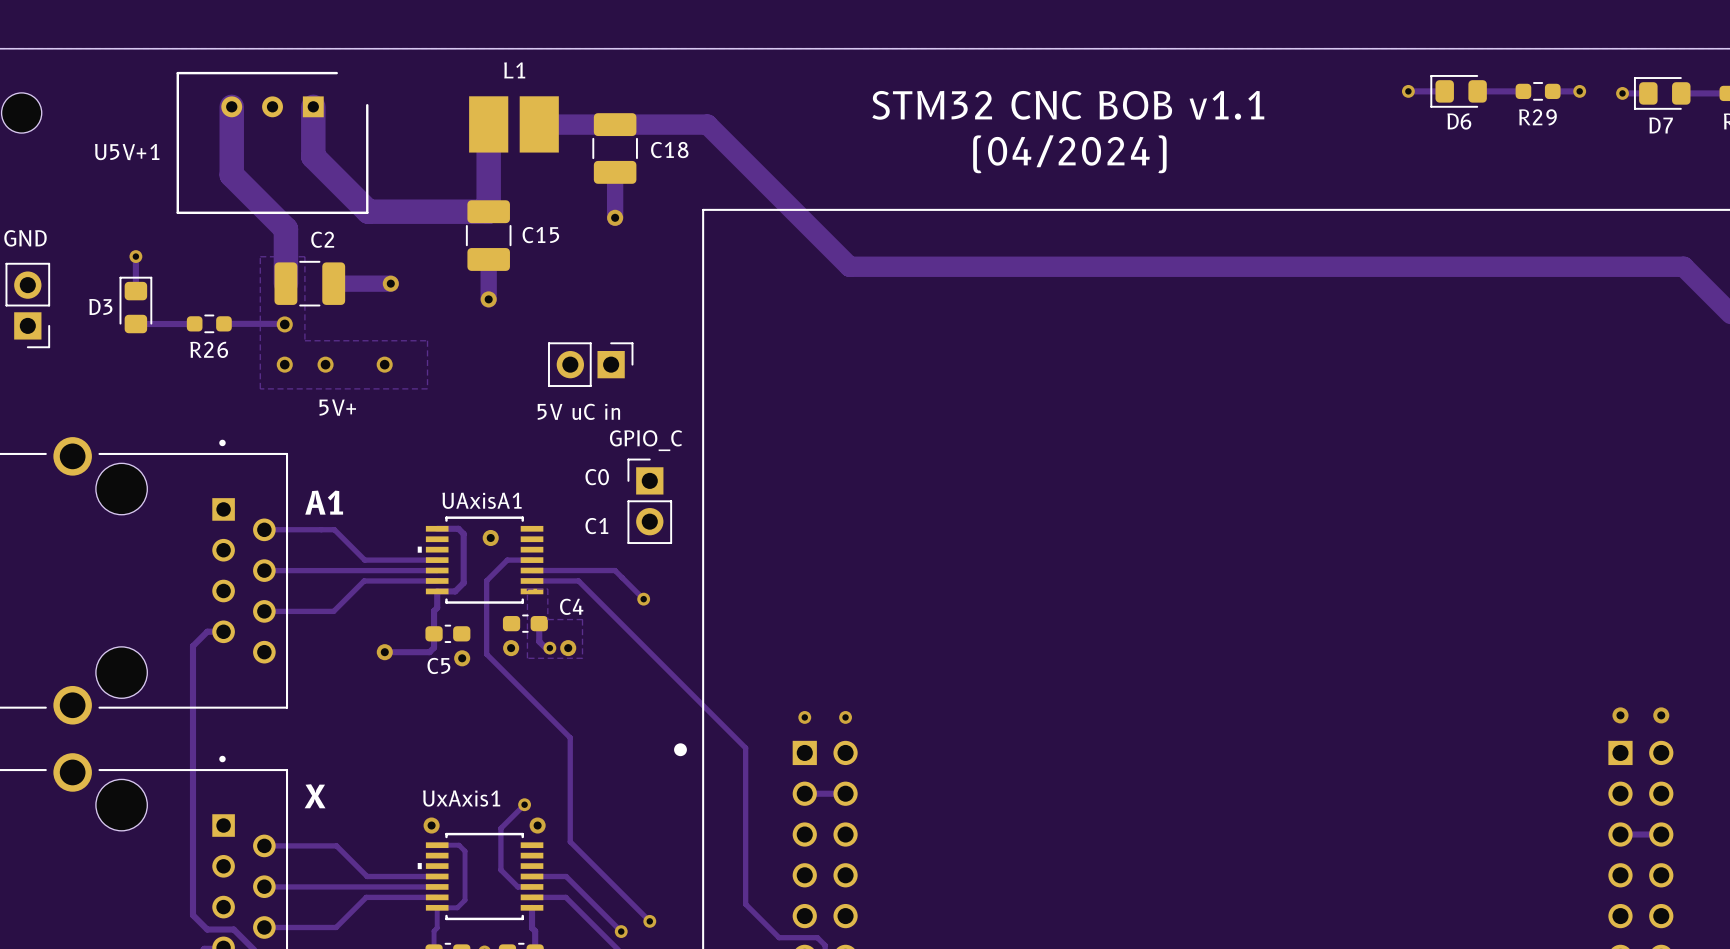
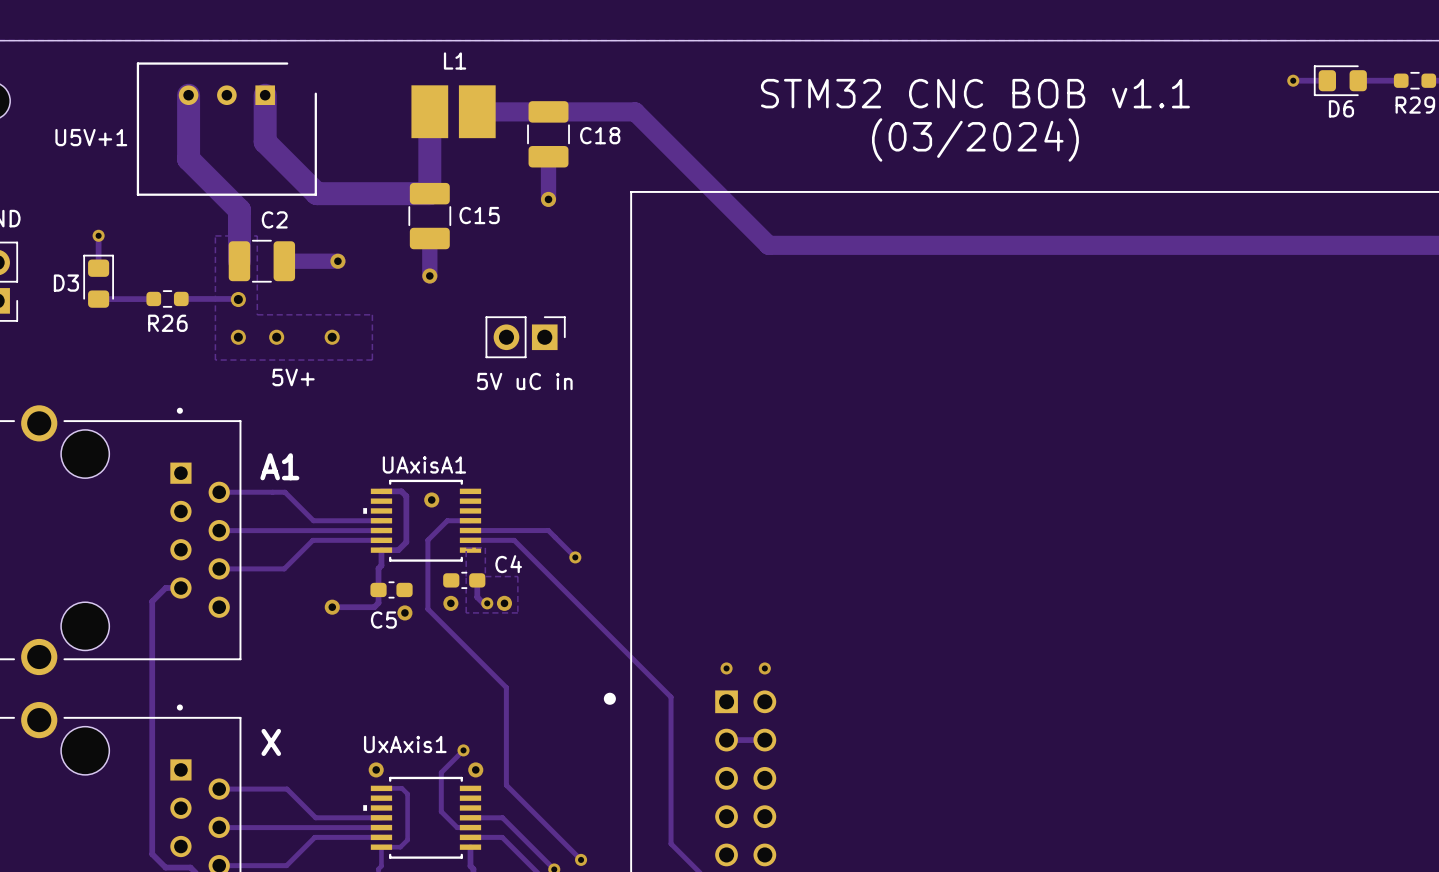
text: (04/2024) (1069, 154) -> (03/2024) (975, 139)
text: GPIO_C (646, 440) -> none
text: C0 (597, 477) -> none
part: (649, 501) -> none
text: C1 (596, 526) -> none

